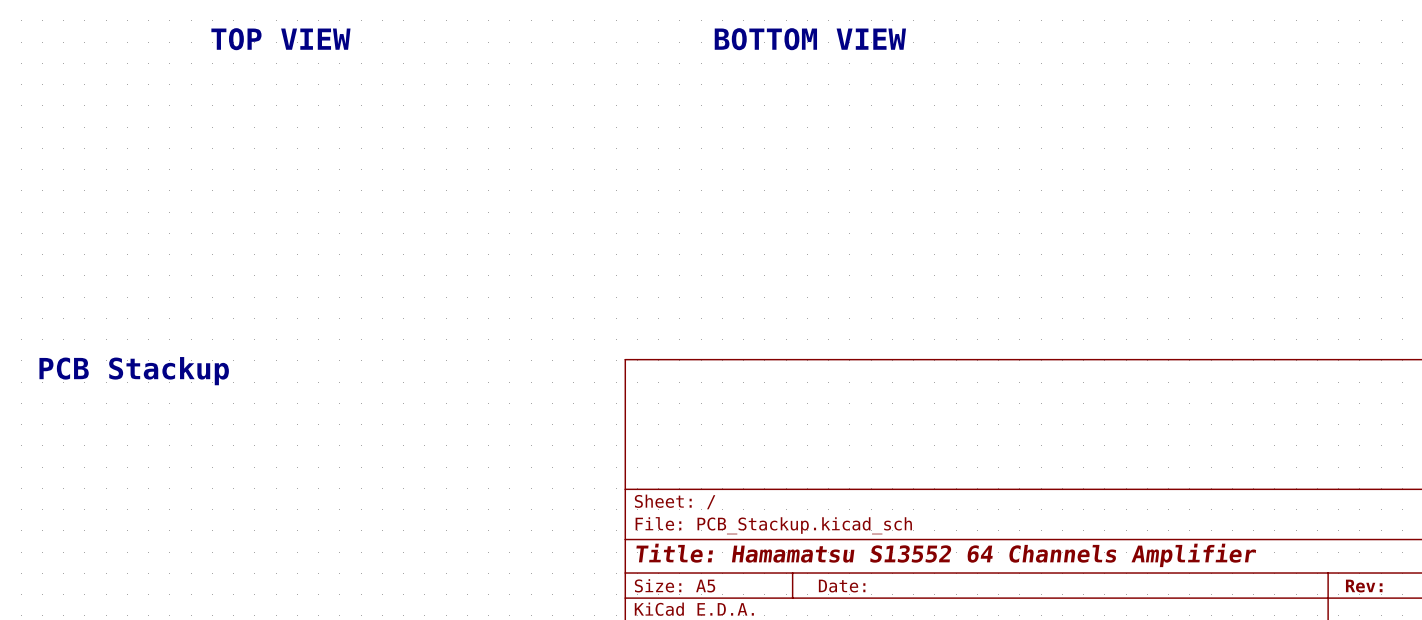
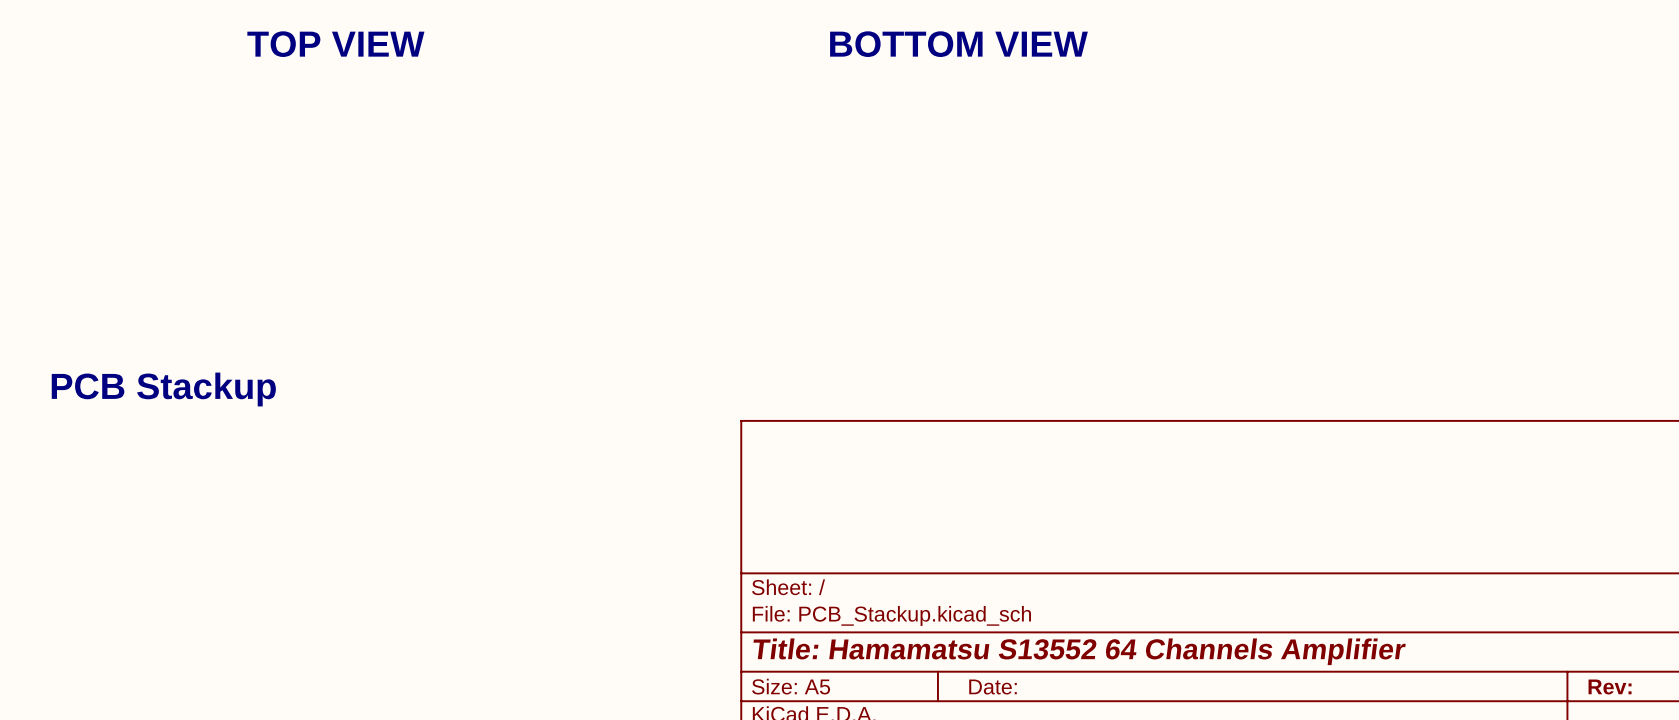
text position: PCB Stackup (134, 371) -> PCB Stackup (163, 389)

